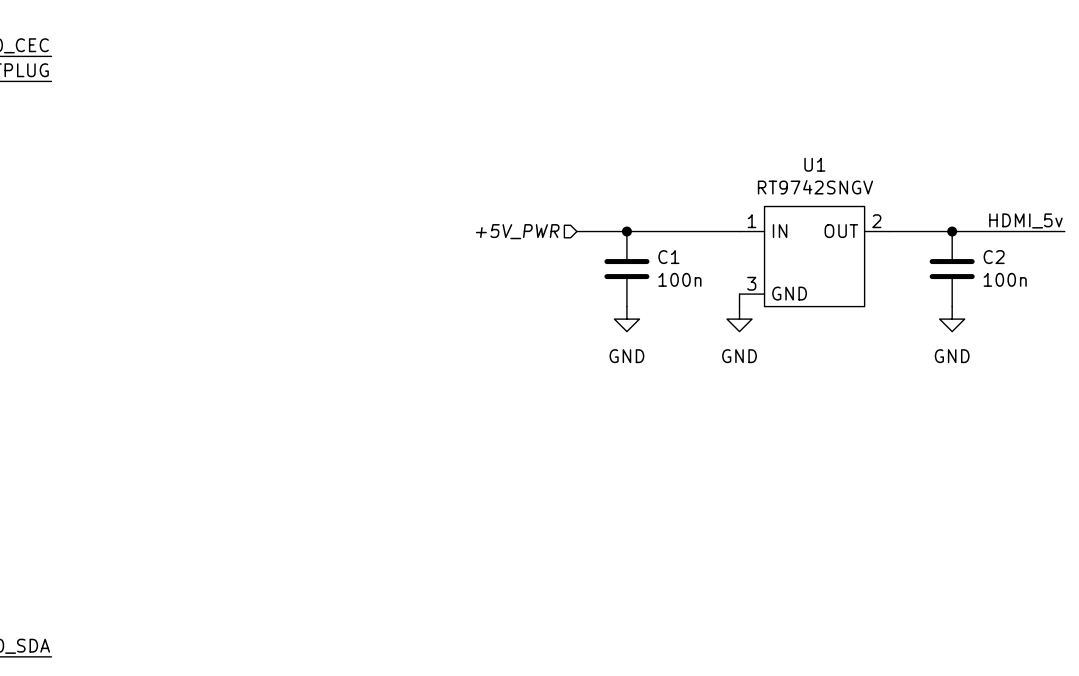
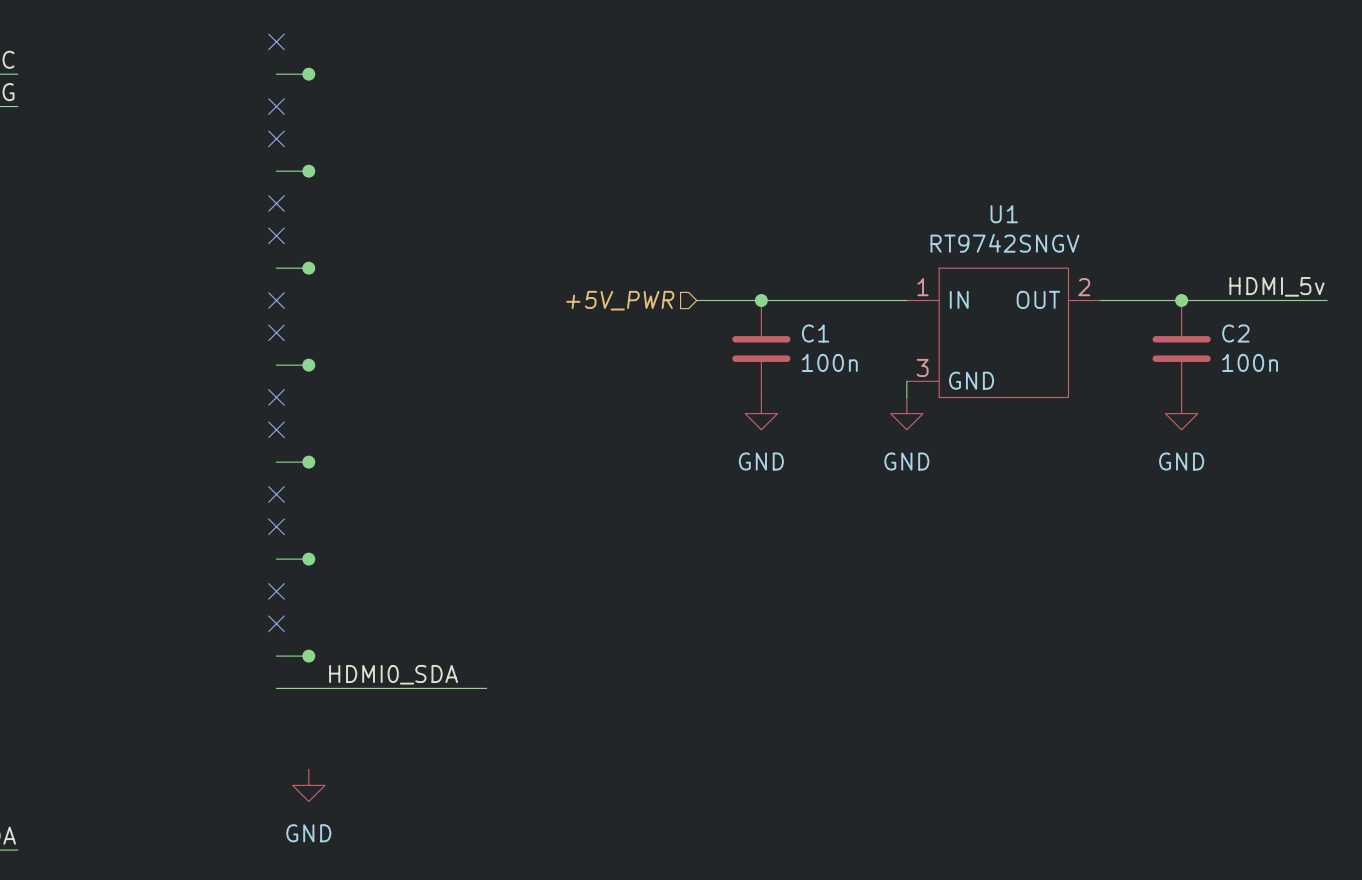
no-connect mark: none -> (276, 41)
wire: none -> (276, 74) (308, 74)
junction: none -> (308, 74)
no-connect mark: none -> (276, 106)
no-connect mark: none -> (276, 138)
wire: none -> (276, 171) (308, 171)
junction: none -> (308, 171)
no-connect mark: none -> (276, 203)
no-connect mark: none -> (276, 235)
wire: none -> (276, 268) (308, 268)
junction: none -> (308, 268)
no-connect mark: none -> (276, 300)
no-connect mark: none -> (276, 332)
wire: none -> (276, 365) (308, 365)
junction: none -> (308, 365)
no-connect mark: none -> (276, 397)
no-connect mark: none -> (276, 429)
wire: none -> (276, 462) (308, 462)
junction: none -> (308, 462)
no-connect mark: none -> (276, 494)
no-connect mark: none -> (276, 526)
wire: none -> (276, 559) (308, 559)
junction: none -> (308, 559)
no-connect mark: none -> (276, 591)
no-connect mark: none -> (276, 623)
wire: none -> (276, 656) (308, 656)
junction: none -> (308, 656)
label: none -> HDMI0_SDA (393, 674)
wire: none -> (276, 688) (486, 688)
power symbol: none -> GND (308, 785)

